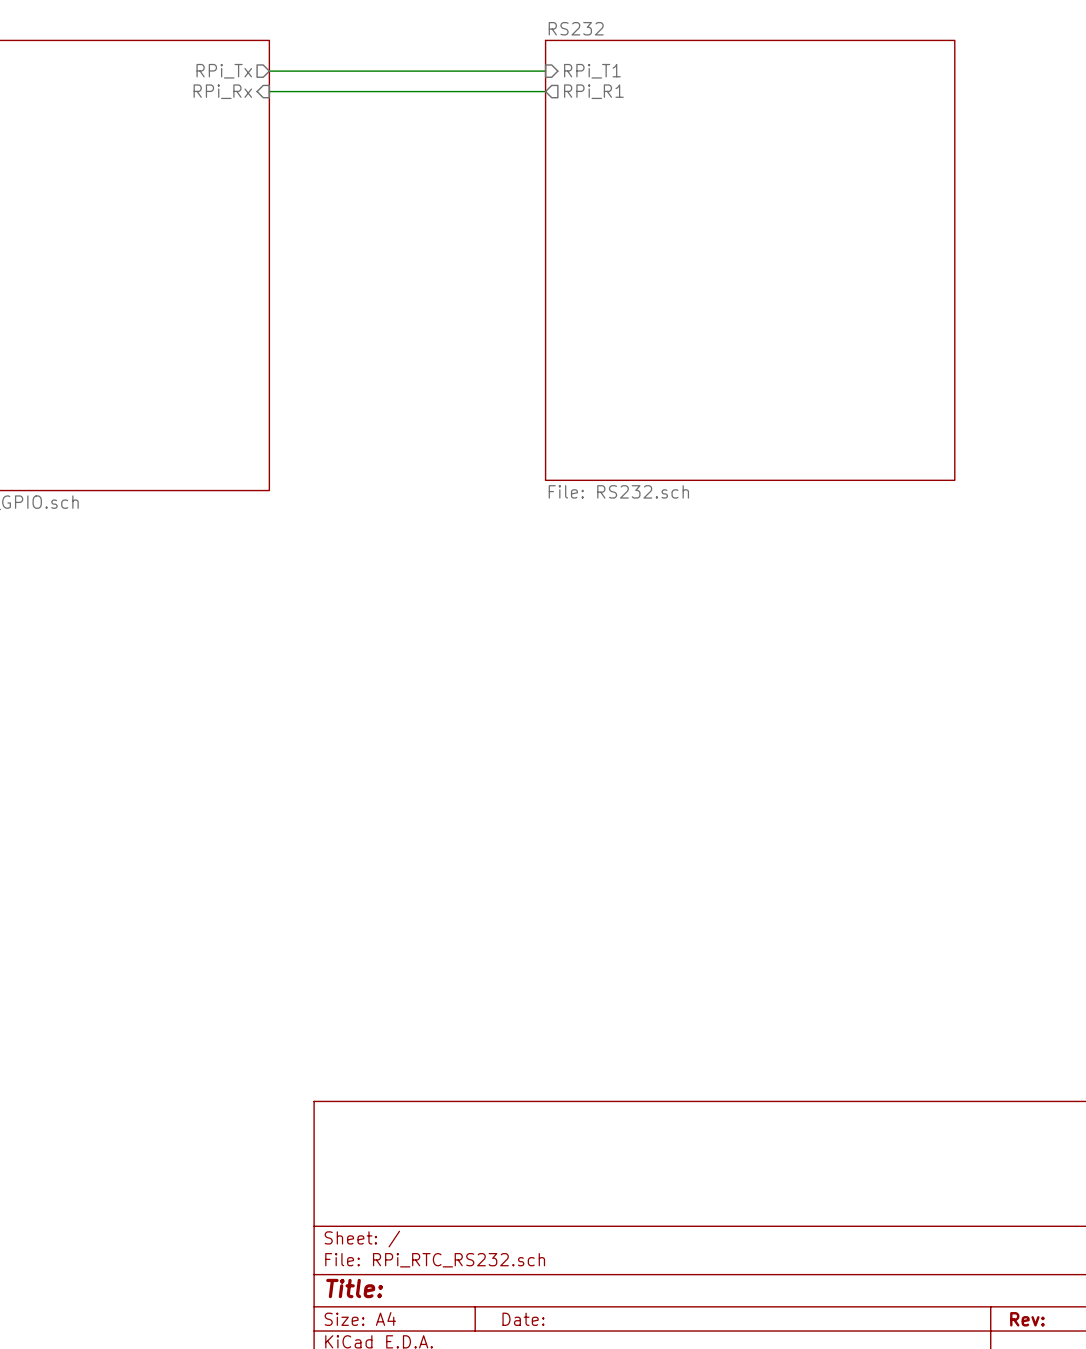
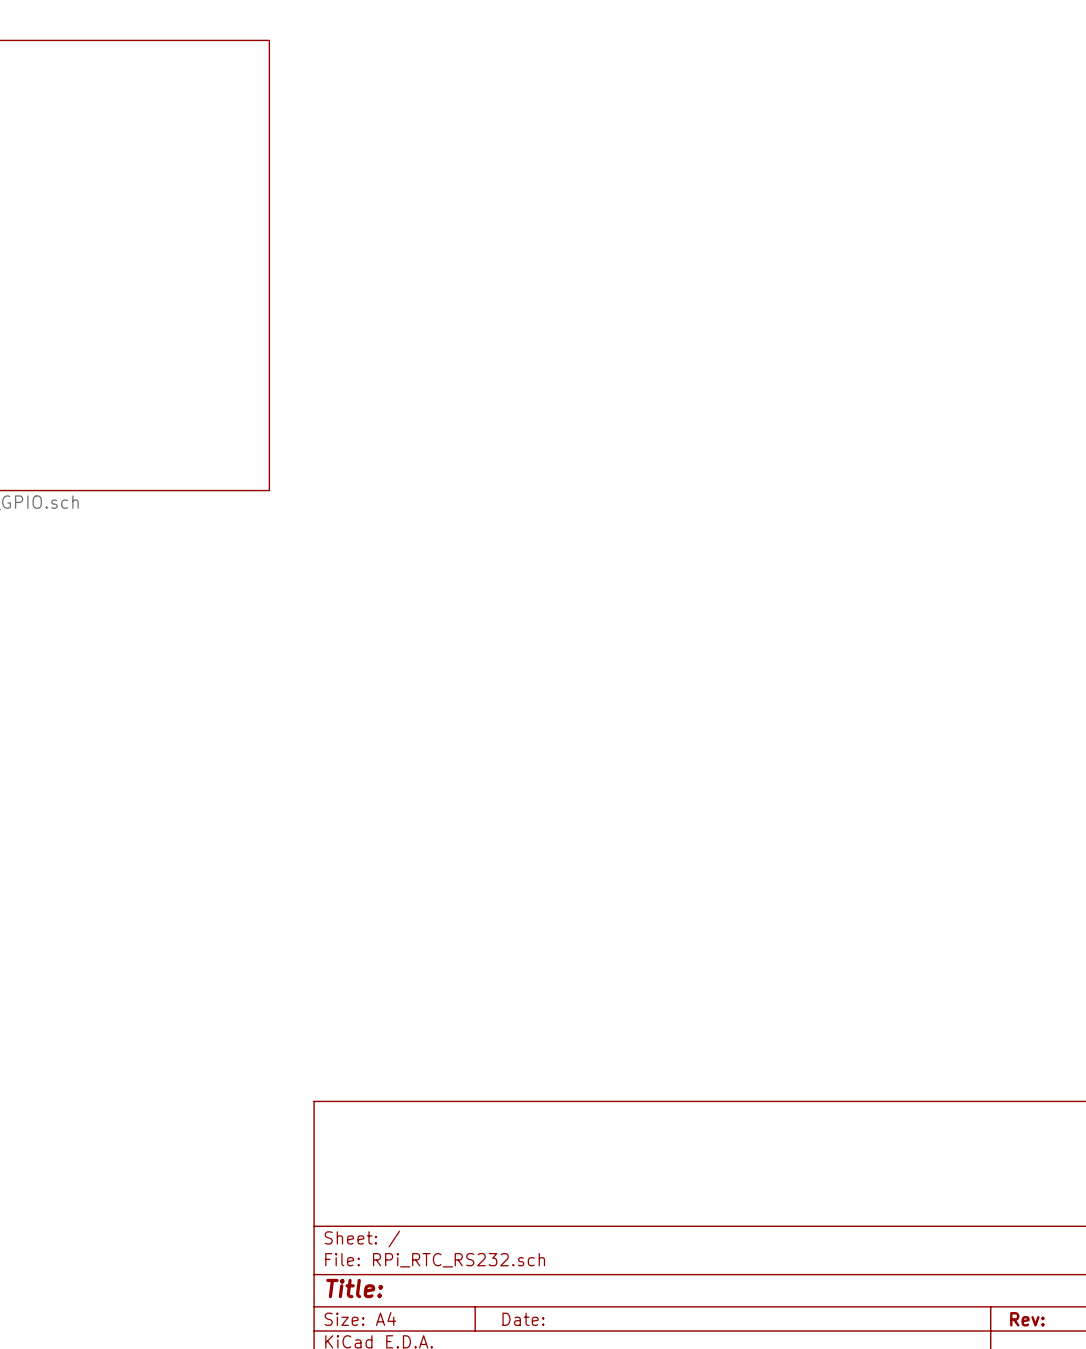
sheet pin: RPi_Tx (224, 71) -> none
wire: (269, 71) (545, 71) -> none
sheet pin: RPi_T1 (592, 71) -> none
sheet pin: RPi_Rx (222, 91) -> none
wire: (269, 91) (545, 91) -> none
sheet pin: RPi_R1 (593, 91) -> none
sheet RS232: File: RS232.sch (750, 260) -> none

